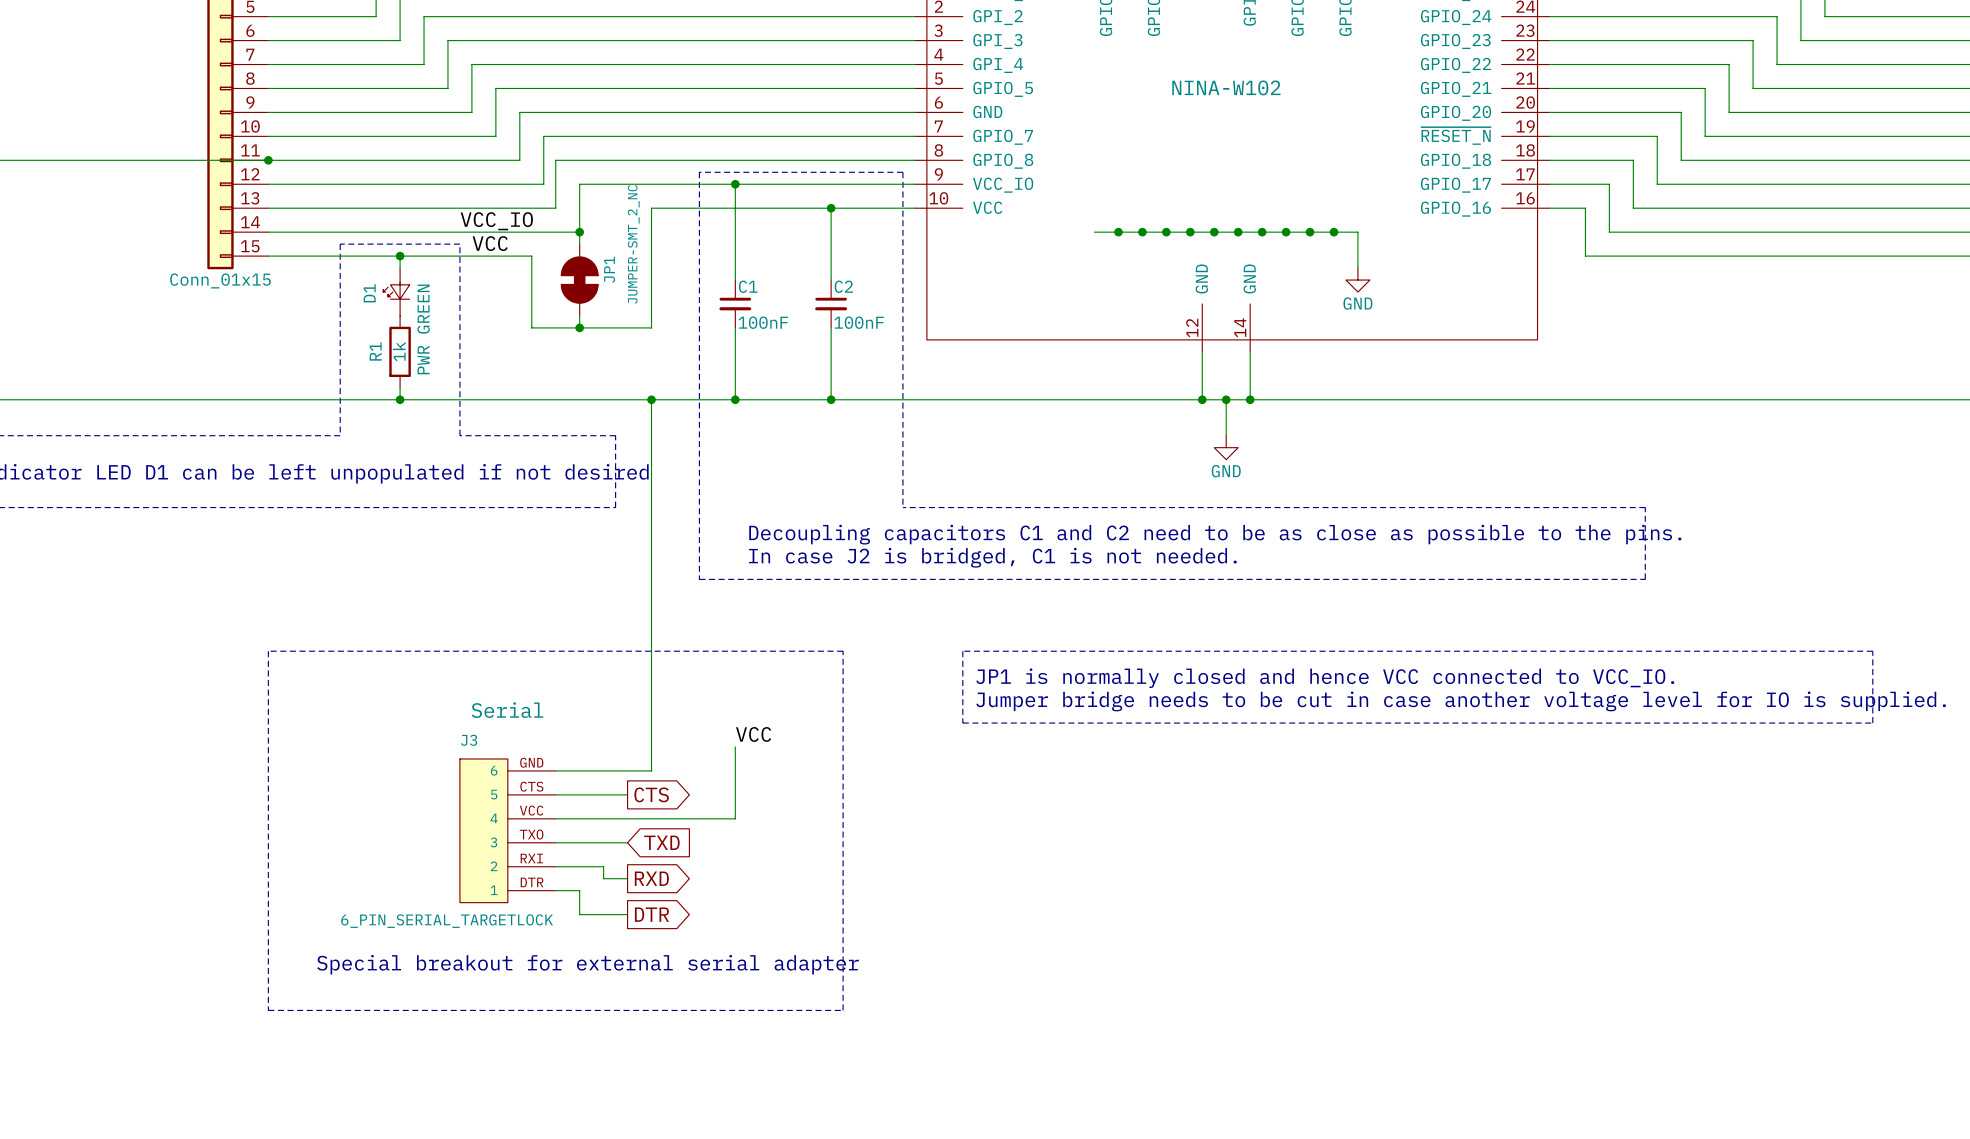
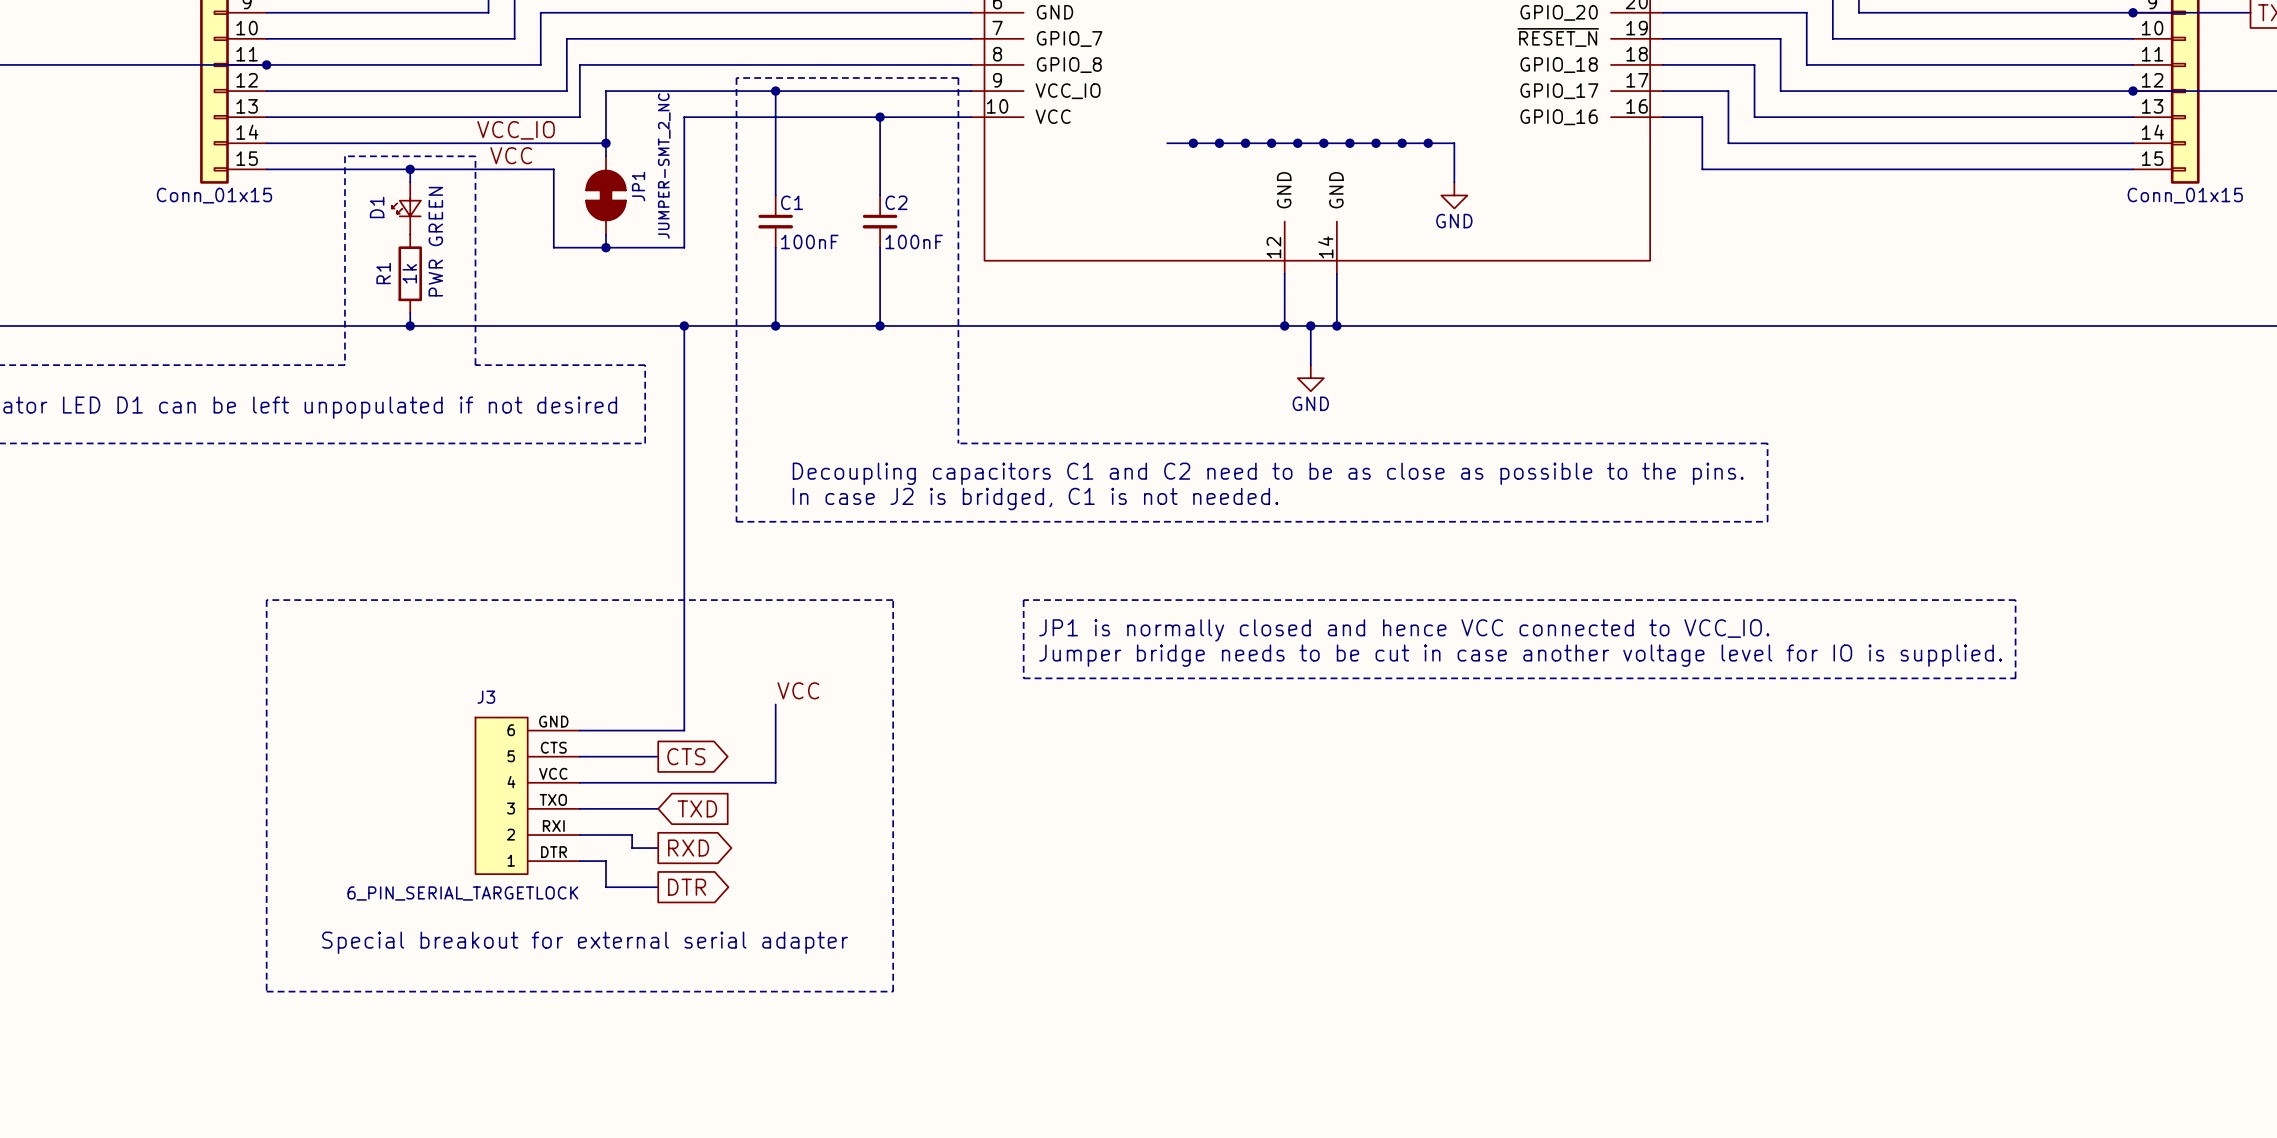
J3 text: Serial (507, 710) -> none

